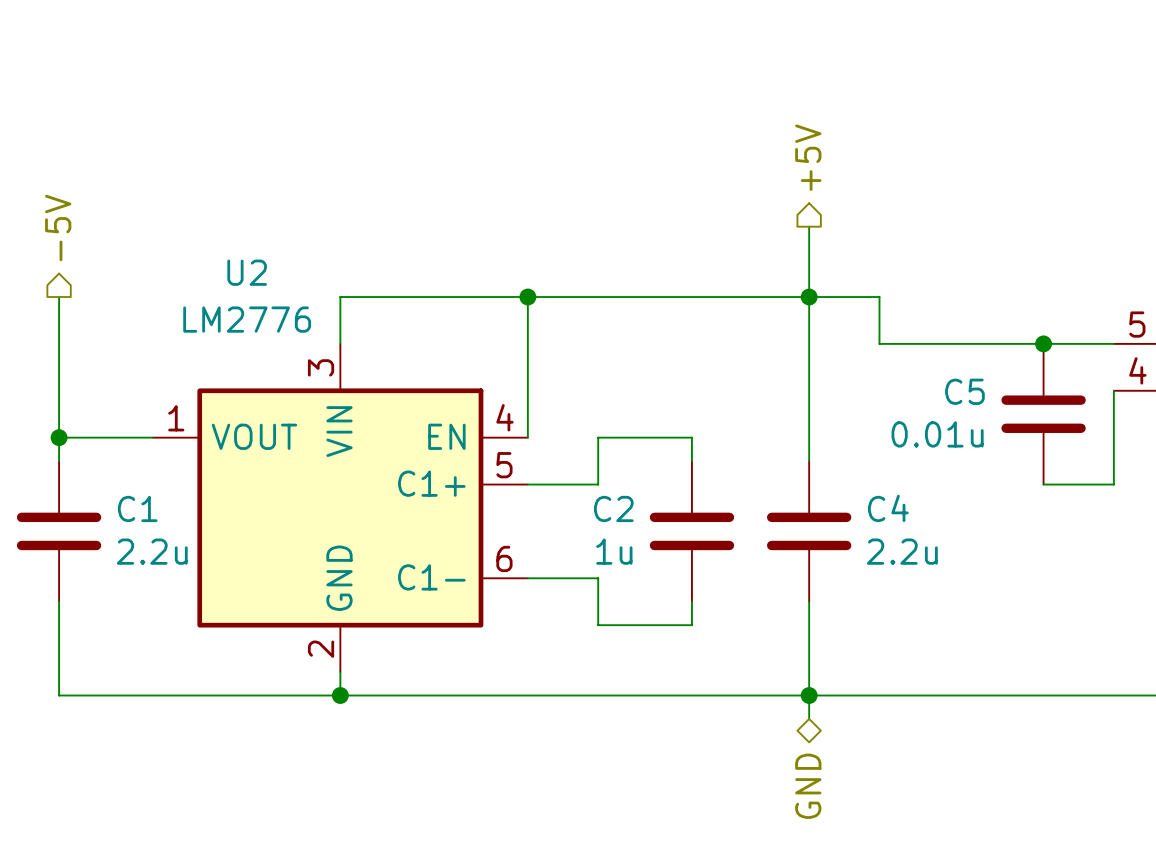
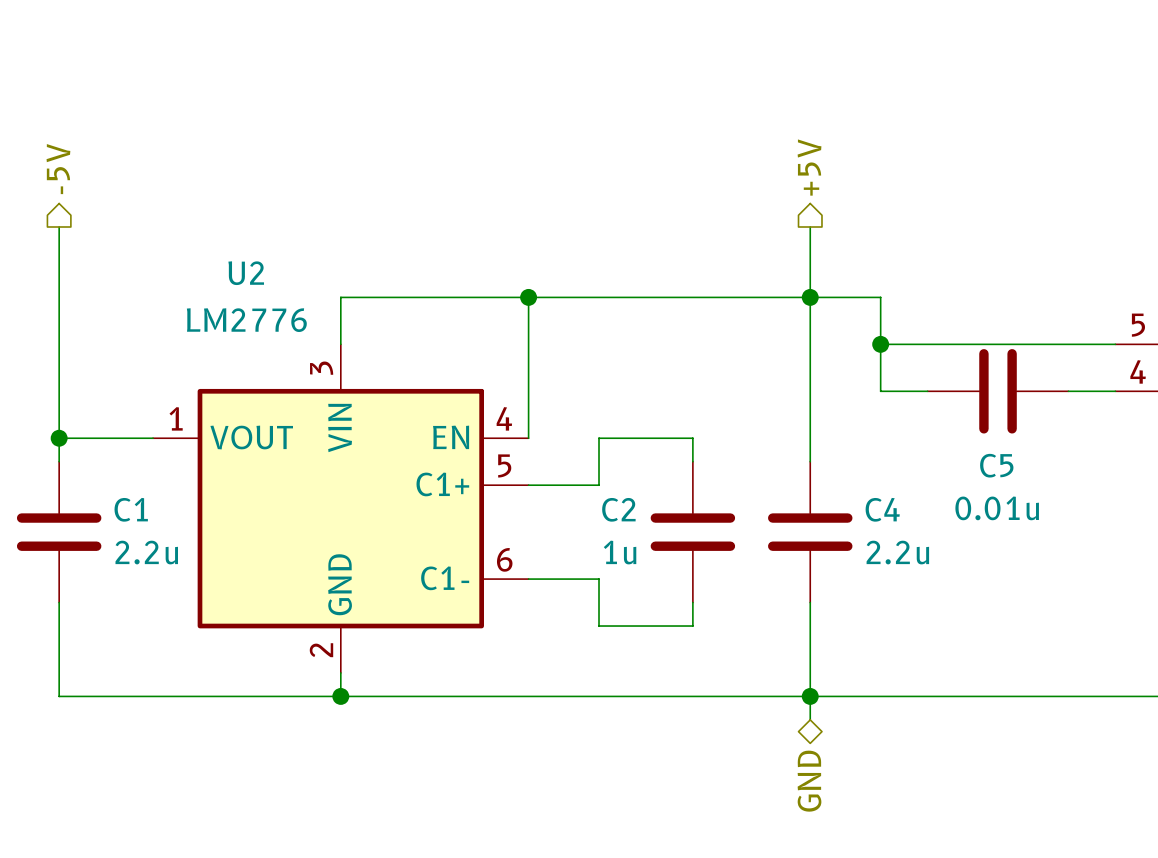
wire: none -> (59, 227) (59, 297)
hierarchical label position: -5V (58, 228) -> -5V (58, 169)
wire: none -> (880, 344) (880, 391) (927, 391)
junction: none -> (880, 344)
junction: (1043, 343) -> none
wire: (1113, 390) (1113, 484) (1043, 484) -> (1115, 391) (1068, 391)
C5 name position: C5 (964, 391) -> C5 (996, 465)
C5 rotation: 0° (1043, 414) -> 90° clockwise (998, 391)
C5 value position: 0.01u (937, 434) -> 0.01u (997, 508)

